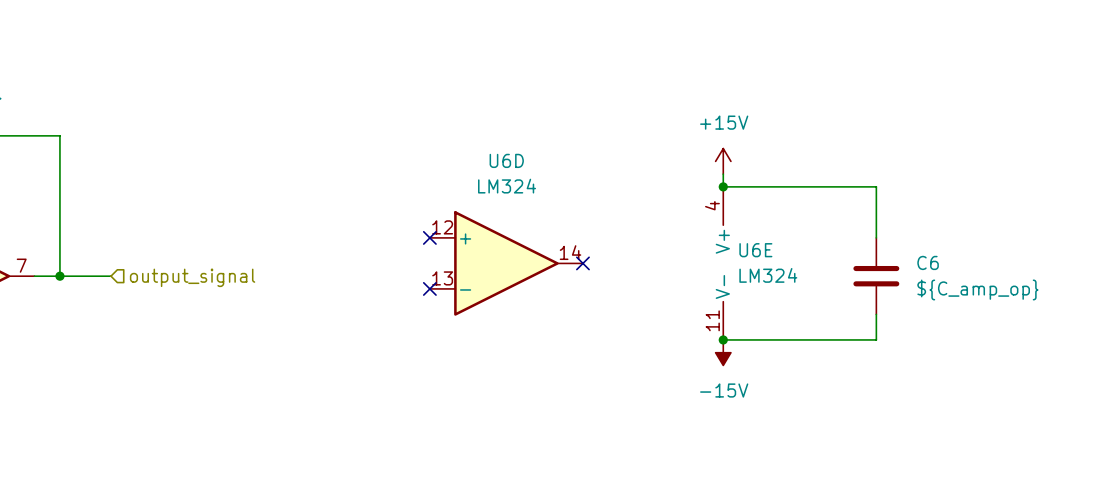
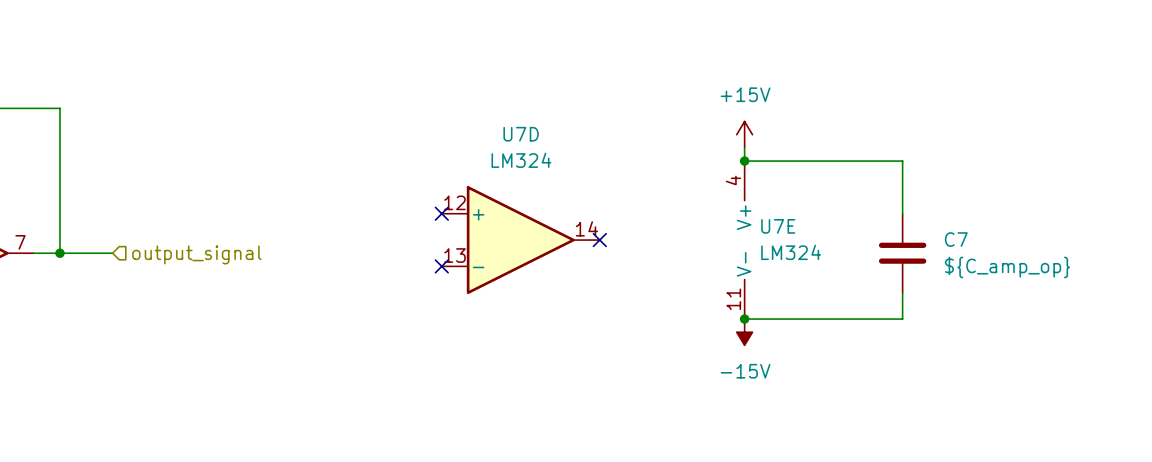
U6D name: U6D (506, 160) -> U7D (521, 134)
U6E name: U6E (755, 250) -> U7E (778, 226)
C6 name: C6 (928, 262) -> C7 (956, 239)

